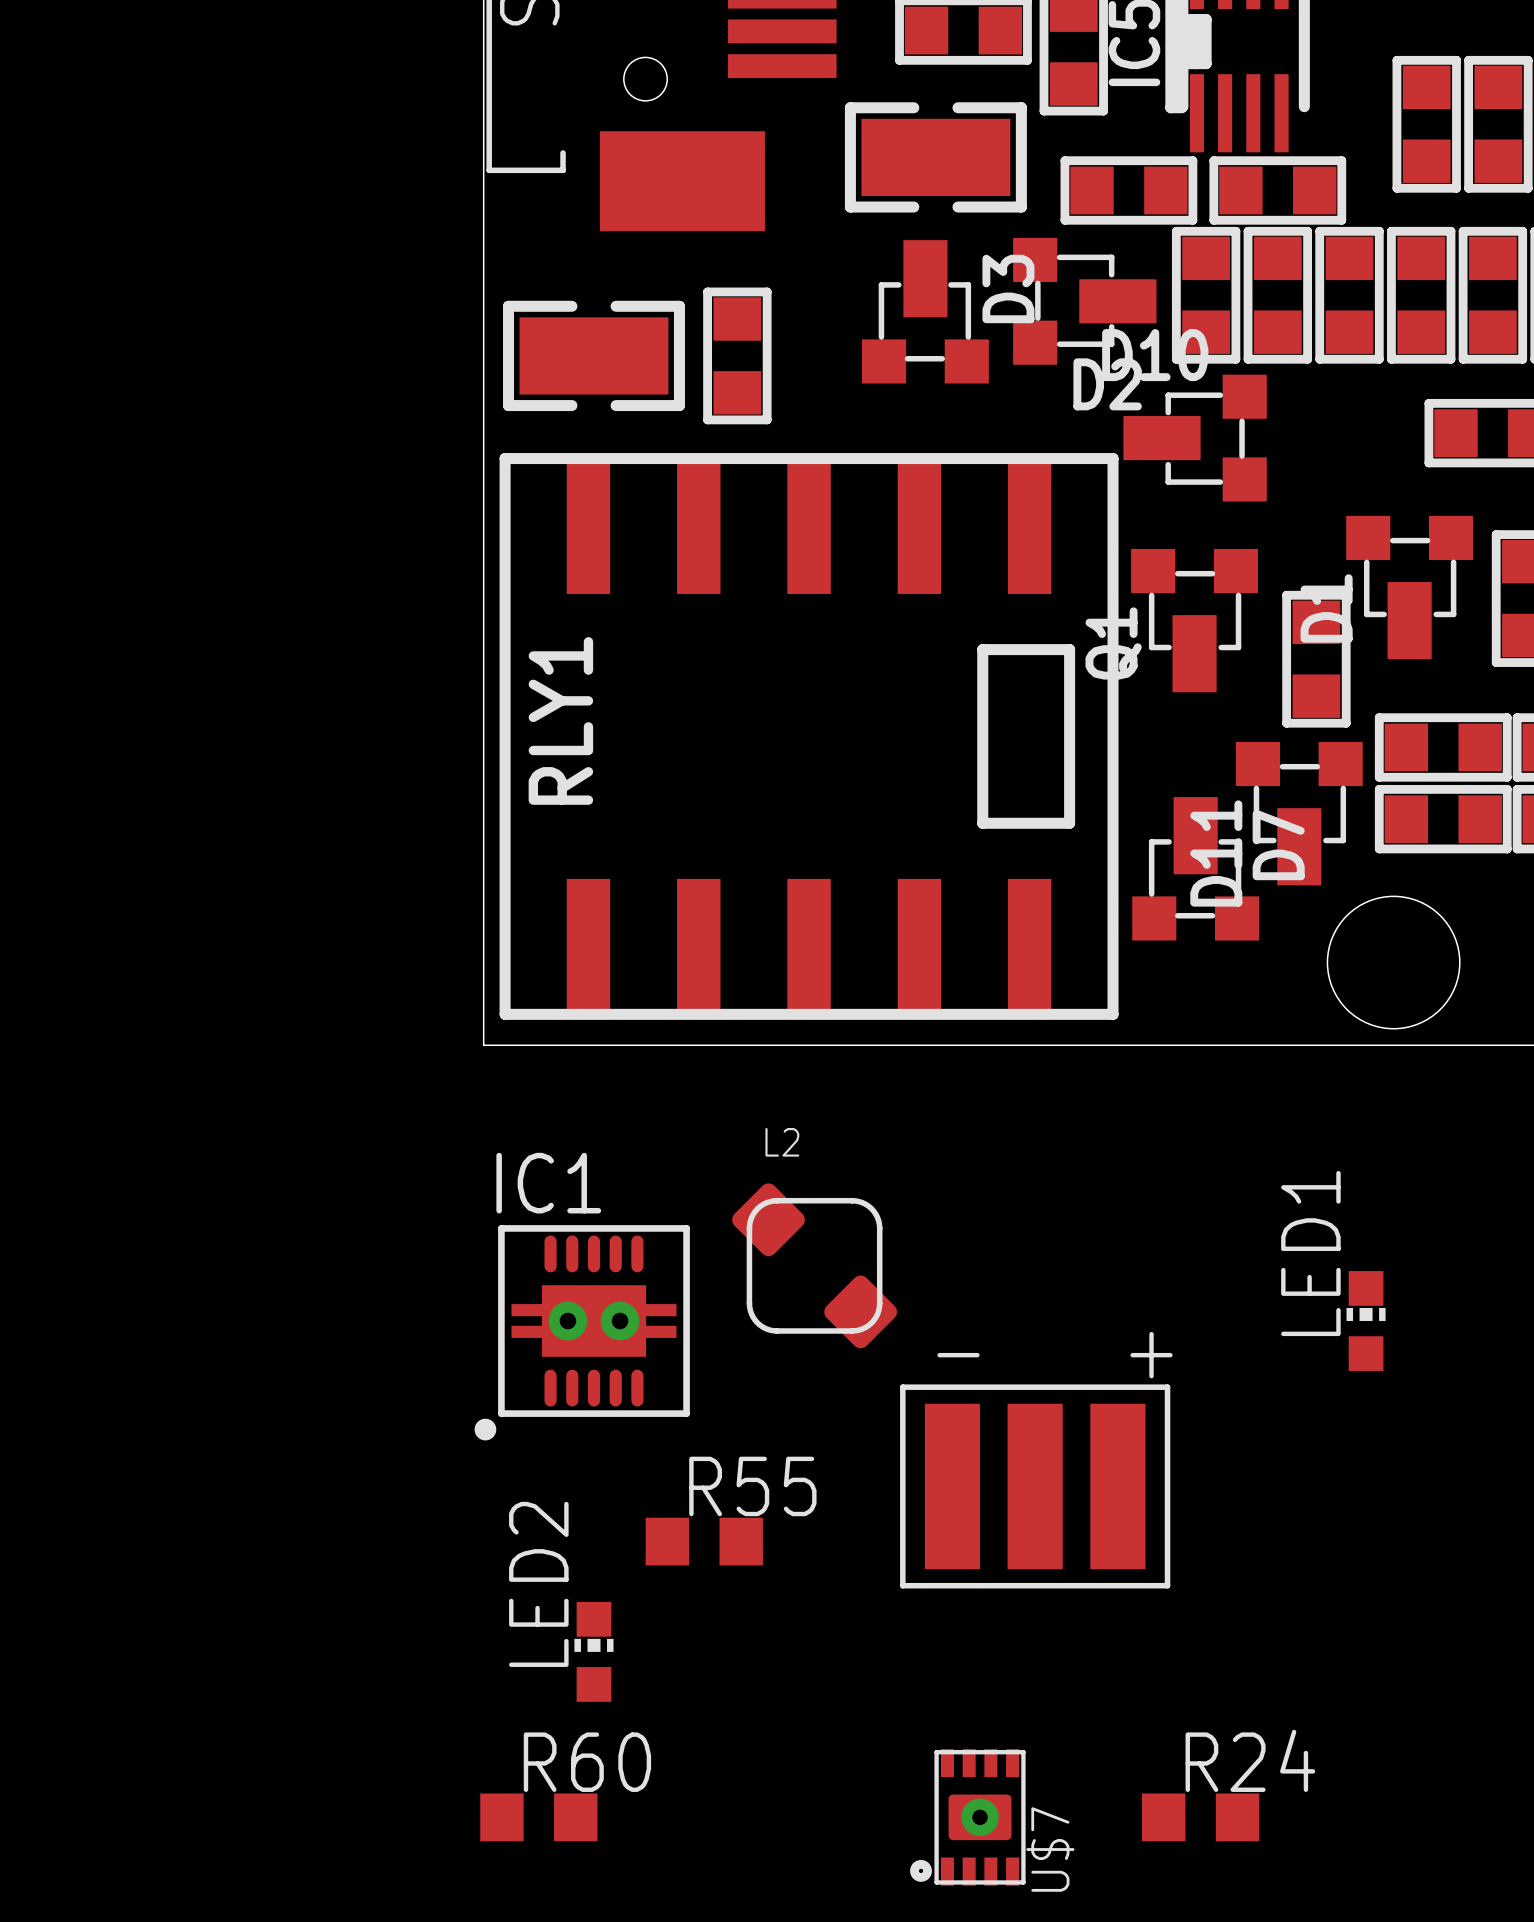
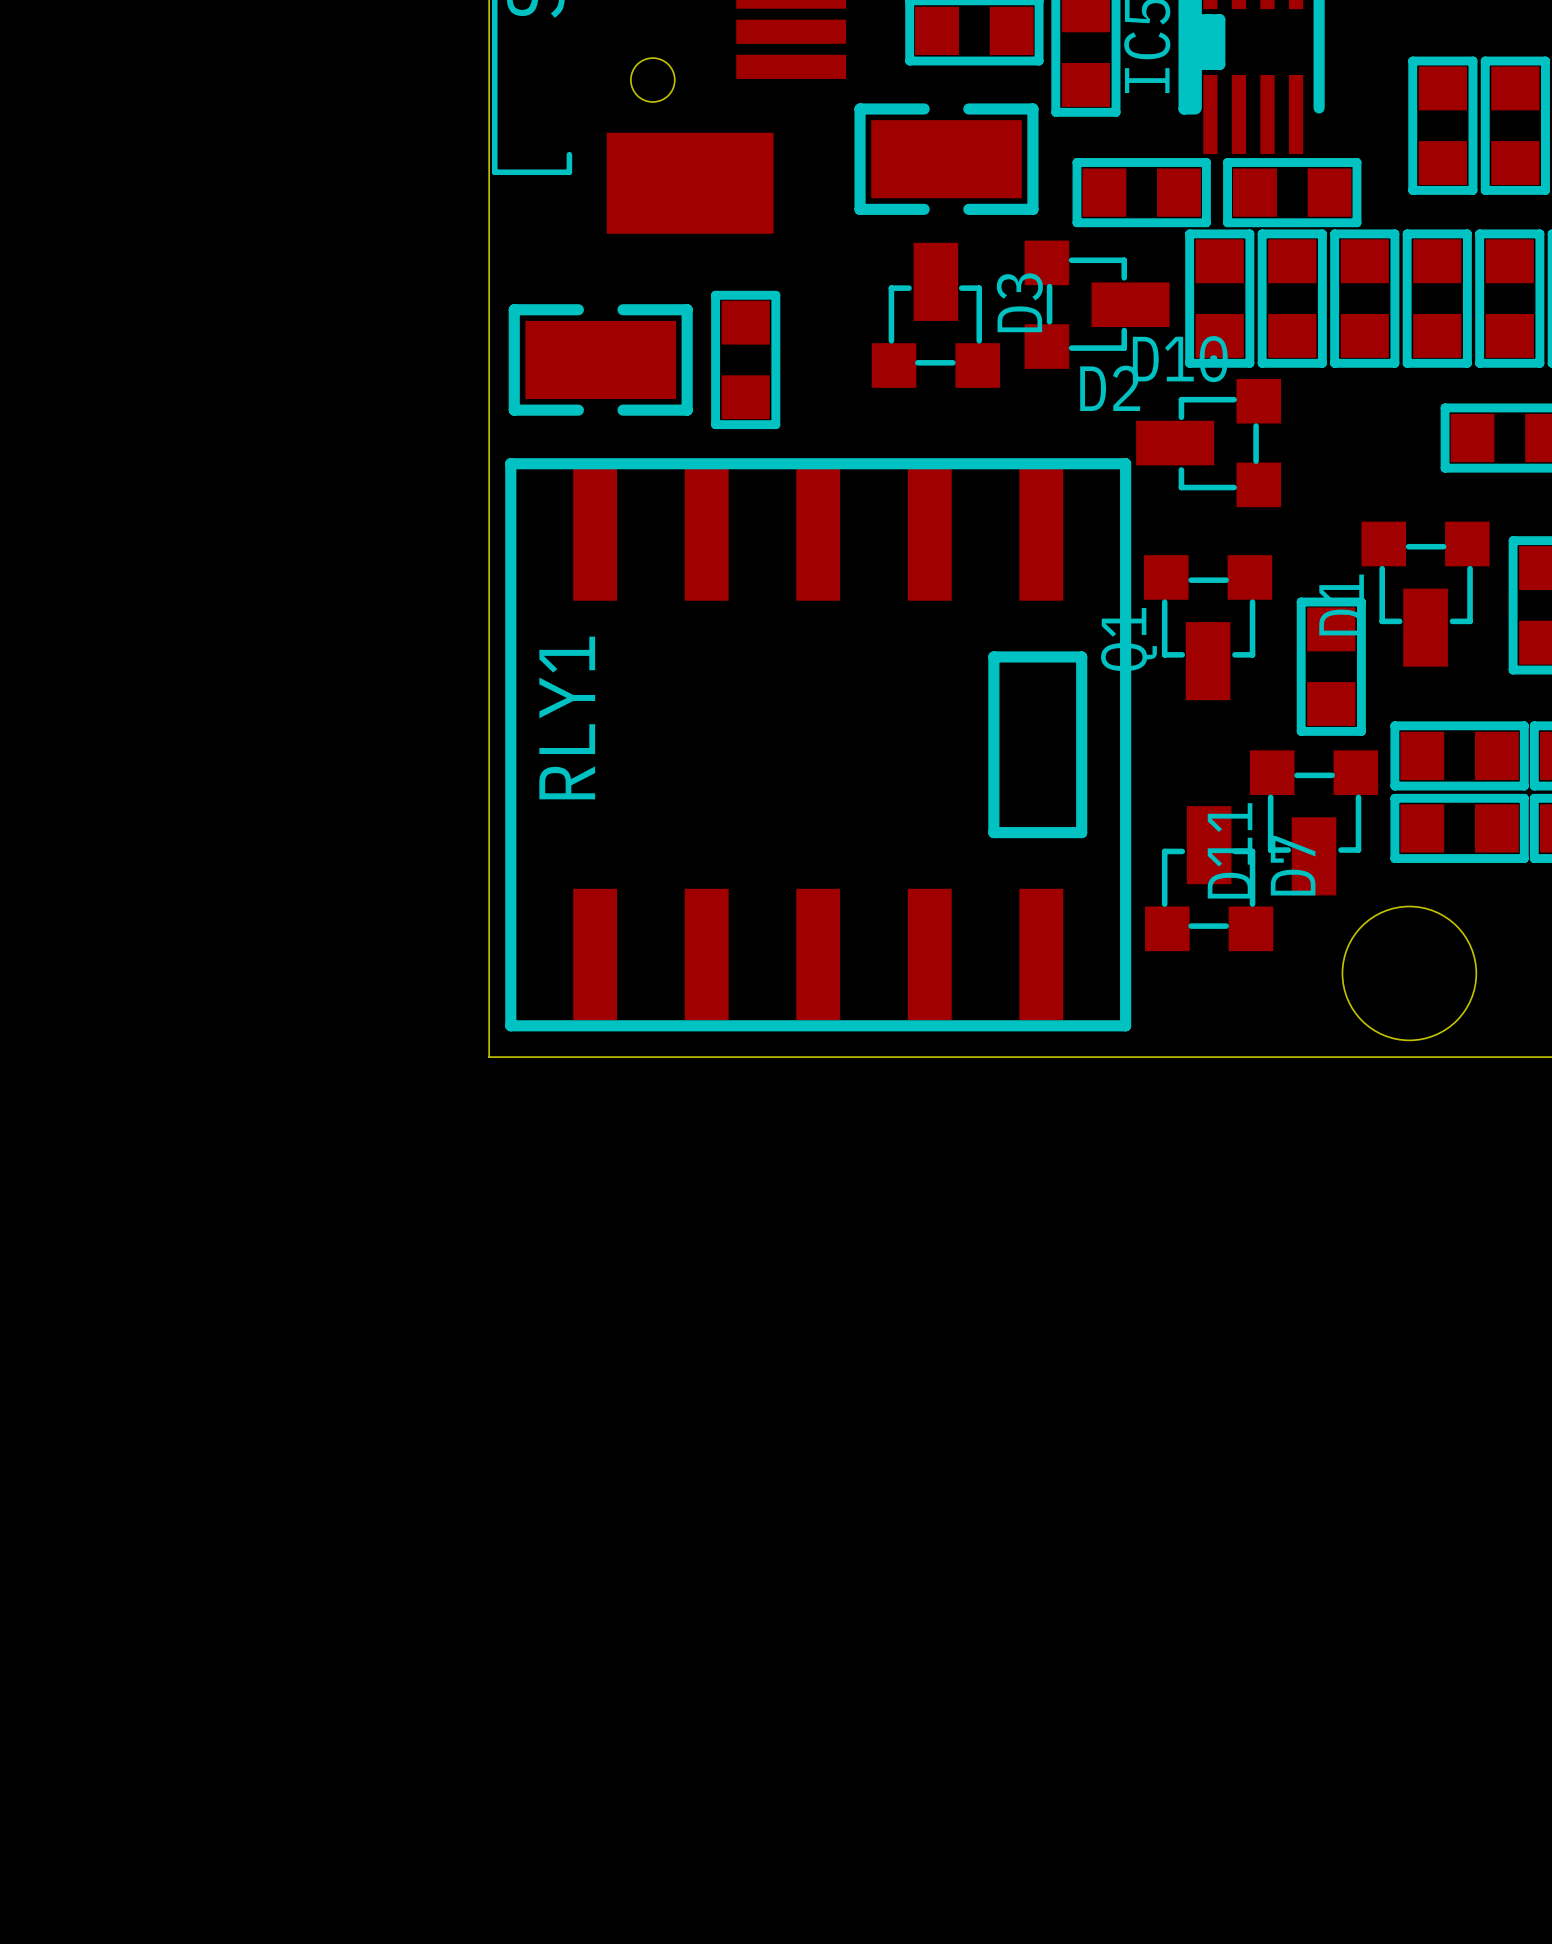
L2: (814, 1265) -> none
LED1: (1366, 1321) -> none
IC1: (582, 1332) -> none
part: (1035, 1486) -> none
R55: (704, 1541) -> none
LED2: (593, 1651) -> none
R60: (538, 1817) -> none
U$7: (967, 1817) -> none
R24: (1200, 1817) -> none

